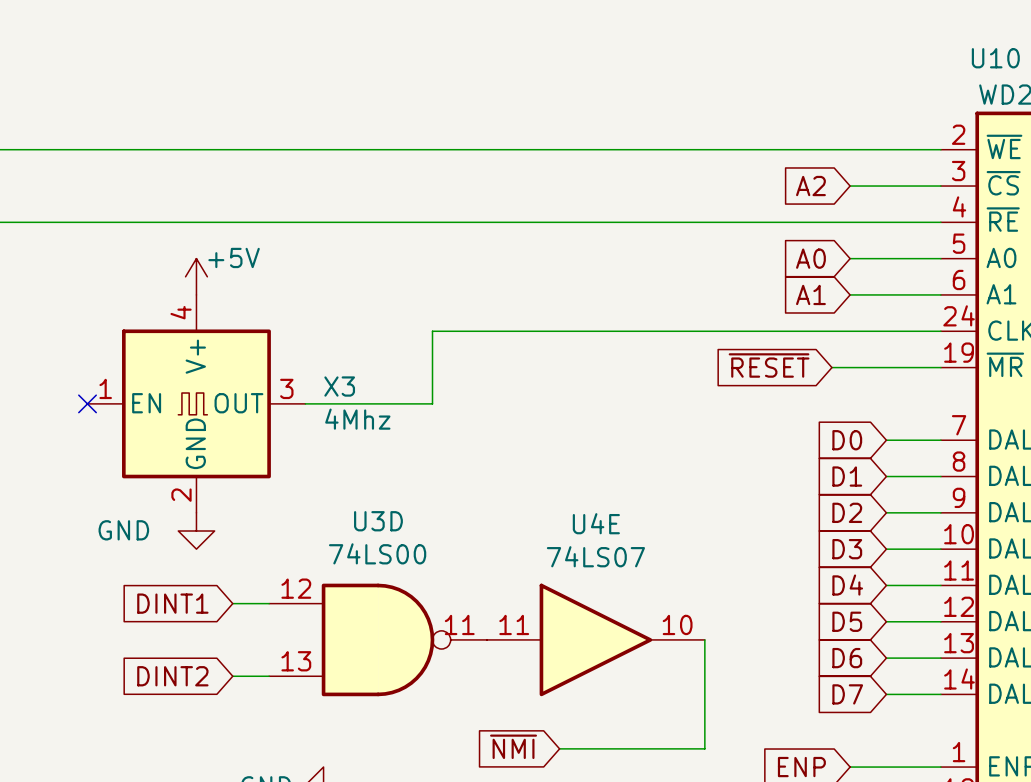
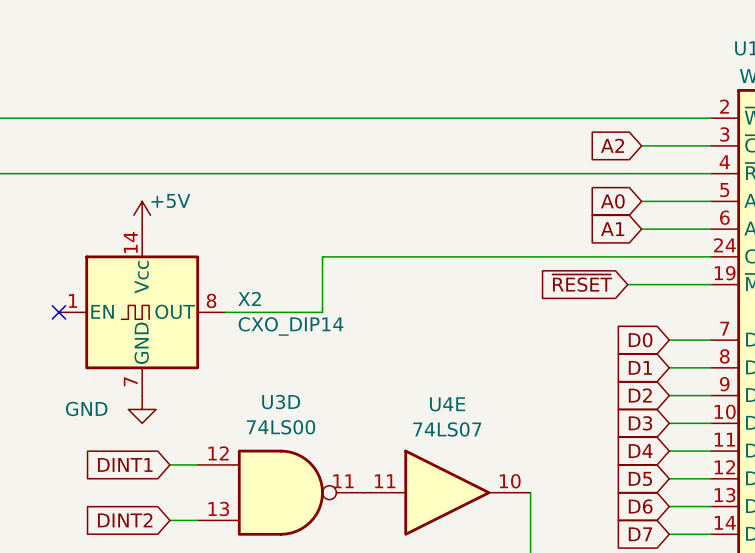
X3: 4Mhz (196, 403) -> none
X2: none -> CXO_DIP14 (142, 312)

